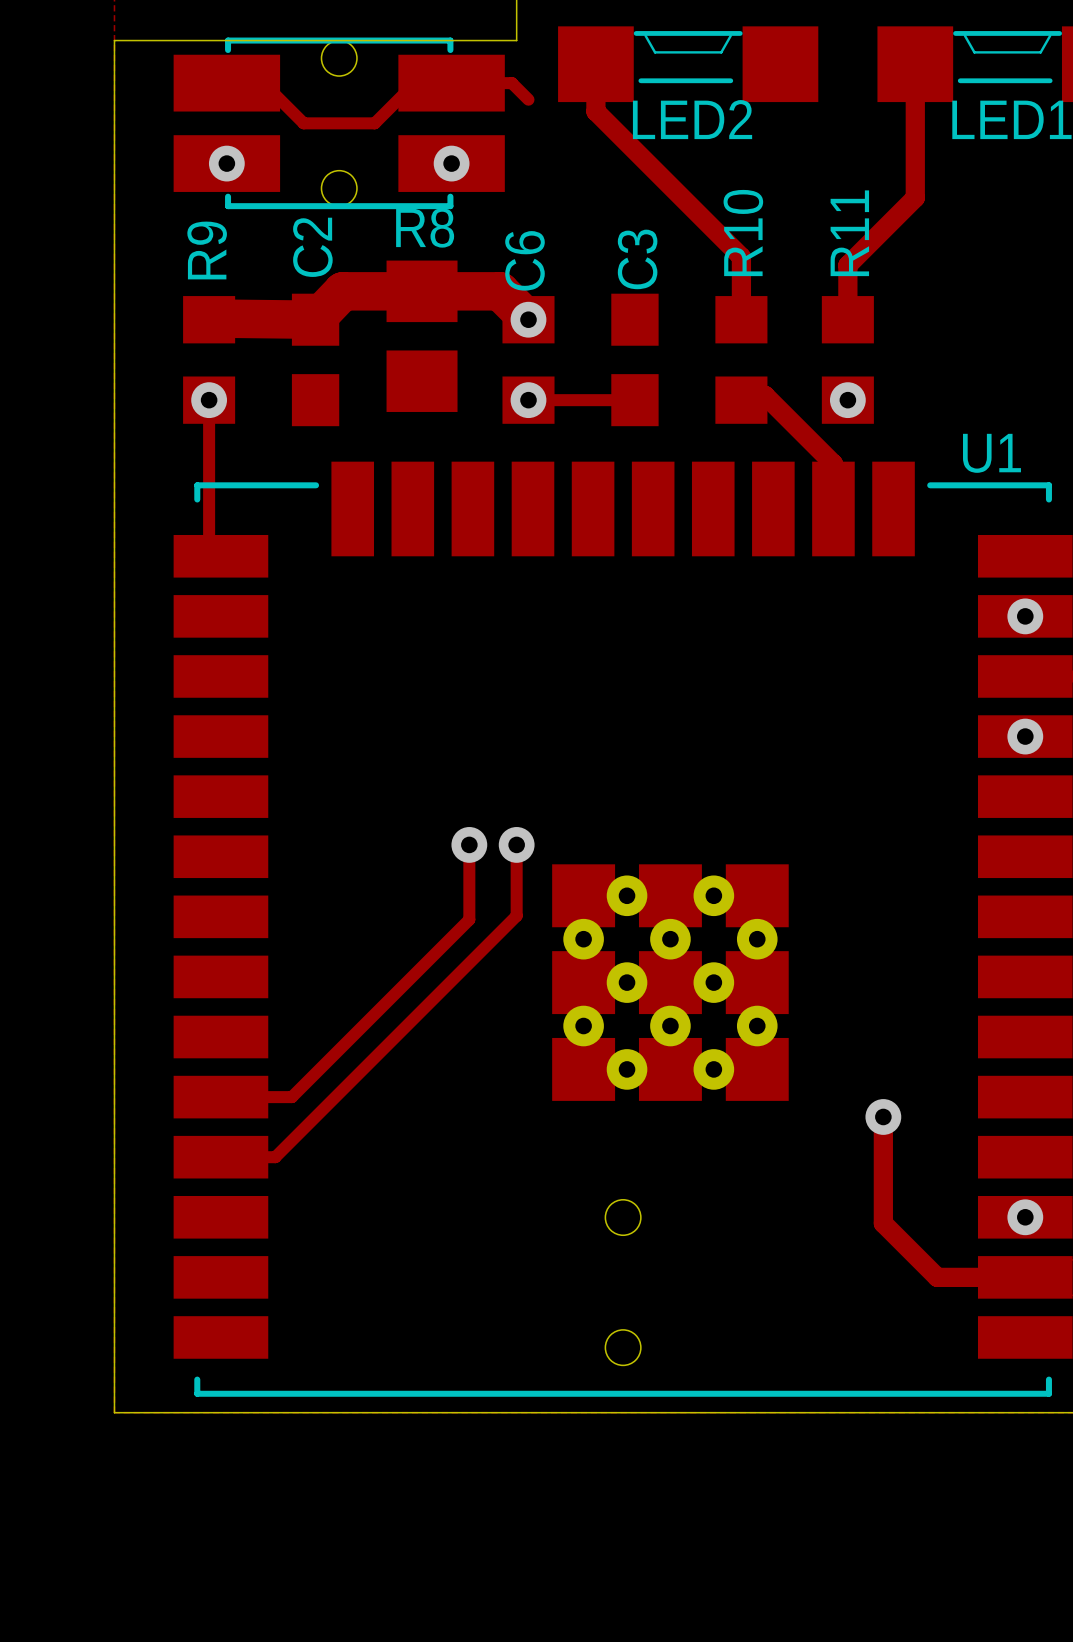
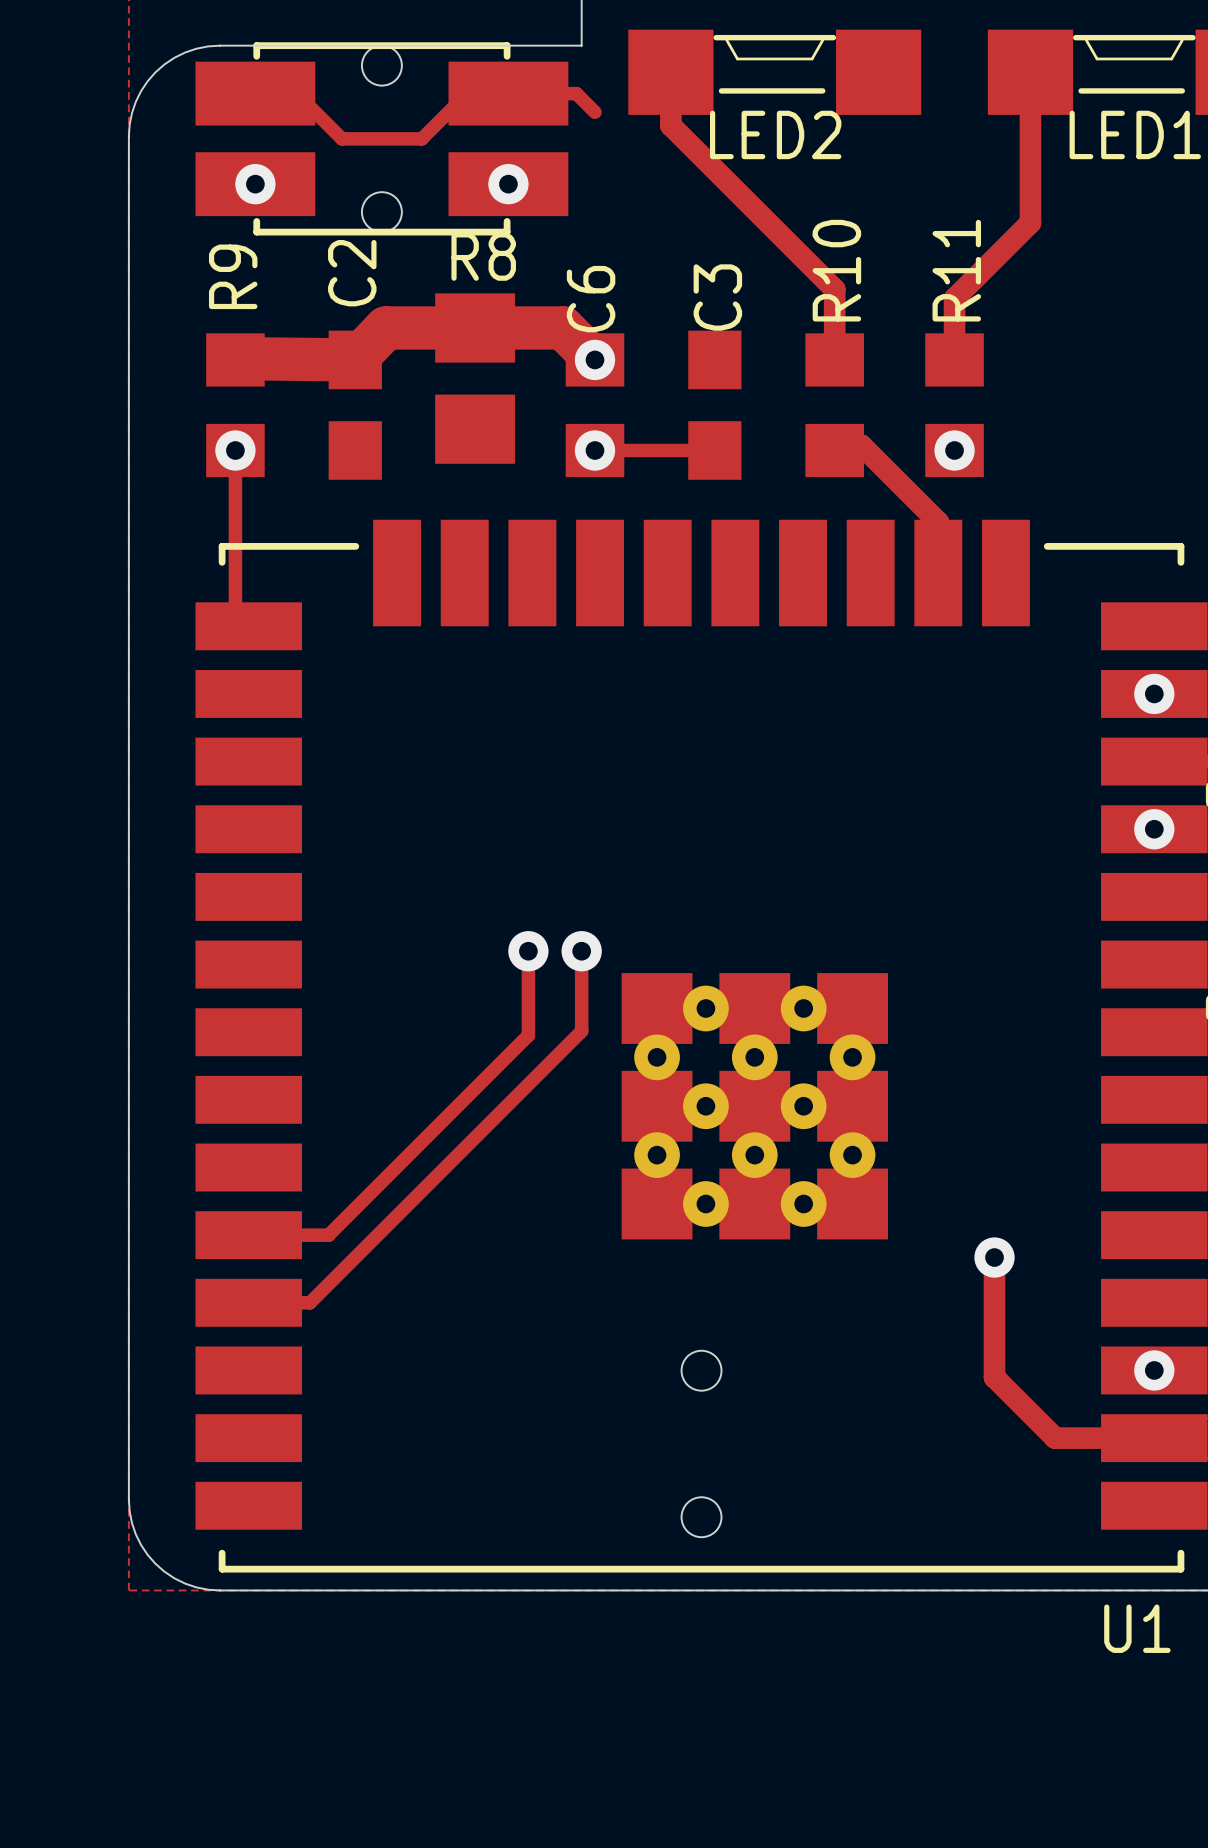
board edge: (195, 40) (114, 40) (114, 121) -> (219, 45) (207, 46) (185, 52) (164, 64) (155, 72) (147, 81) (135, 101) (129, 124) (128, 136)
U1 name position: U1 (991, 453) -> U1 (1137, 1628)
board edge: (114, 1331) (114, 1412) (195, 1412) -> (128, 1499) (129, 1511) (135, 1534) (147, 1554) (155, 1563) (164, 1571) (185, 1583) (207, 1589) (219, 1590)

